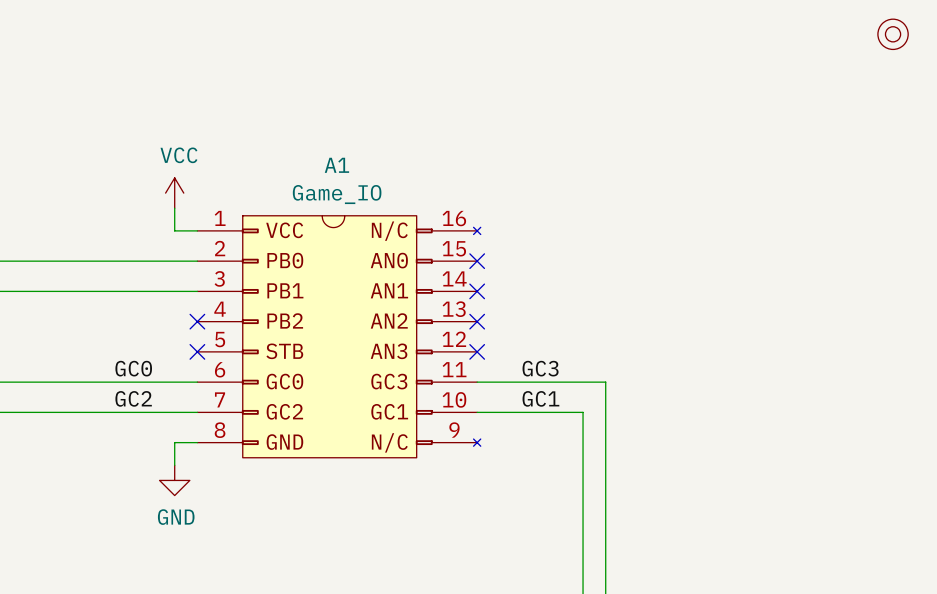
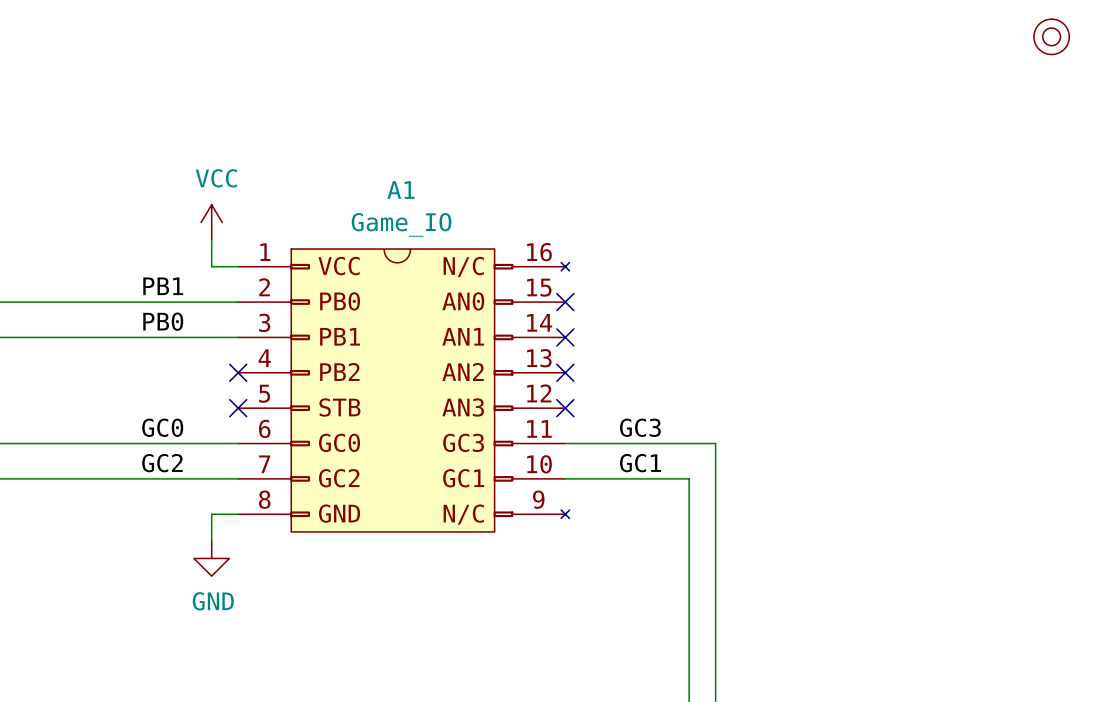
label: none -> PB1 (163, 286)
label: none -> PB0 (163, 321)

